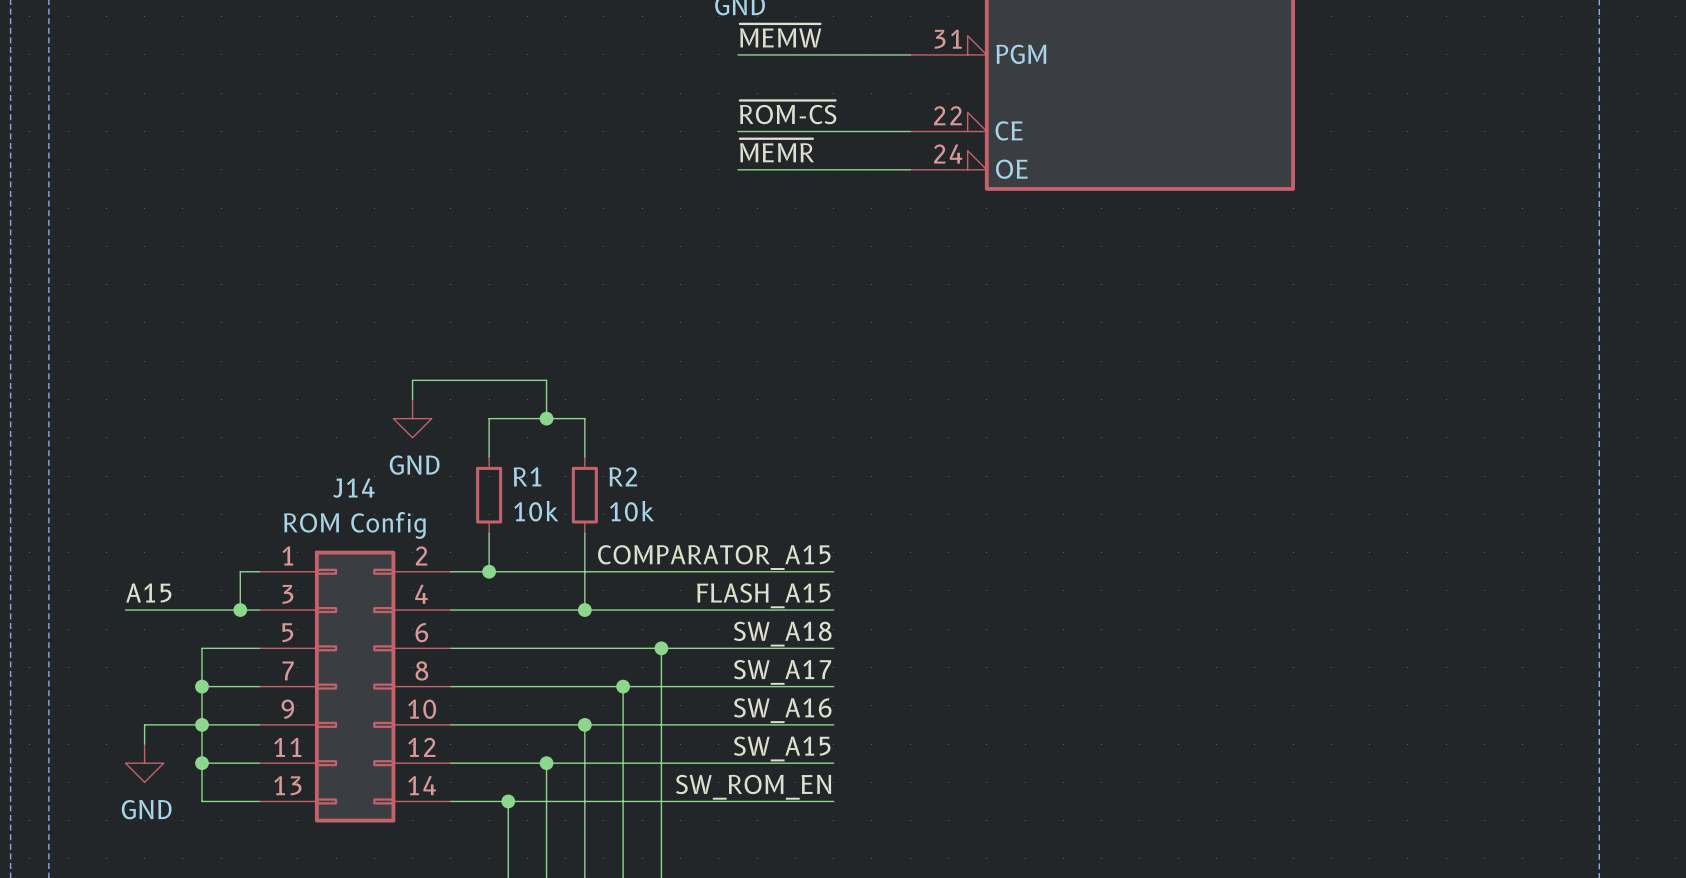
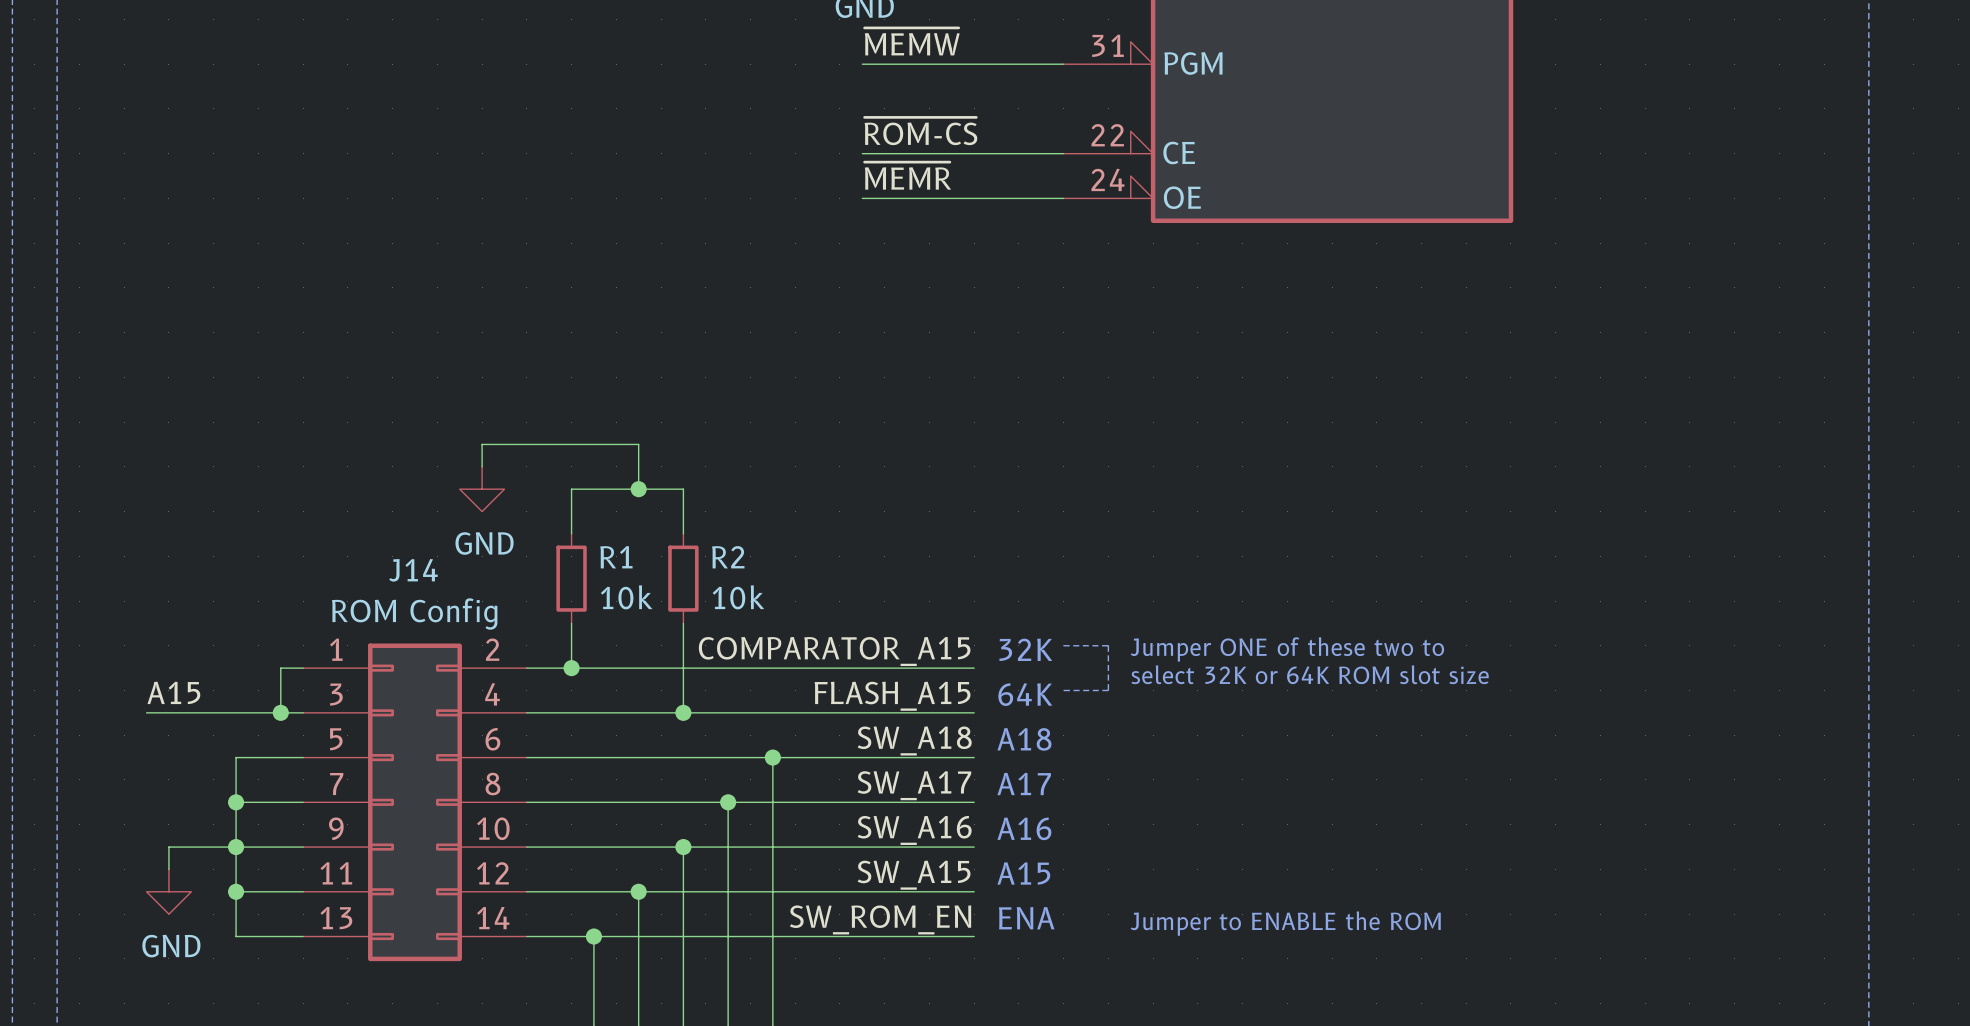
line: none -> (1063, 645) (1108, 645) (1108, 690) (1063, 690)
text: none -> Jumper ONE of these two to (1287, 649)
text: none -> 32K (1025, 649)
text: none -> select 32K or 64K ROM slot size (1310, 674)
text: none -> 64K (1025, 694)
text: none -> A18 (1024, 739)
text: none -> A17 (1024, 783)
text: none -> A16 (1024, 828)
text: none -> A15 (1023, 873)
text: none -> ENA (1026, 918)
text: none -> Jumper to ENABLE the ROM (1285, 923)

